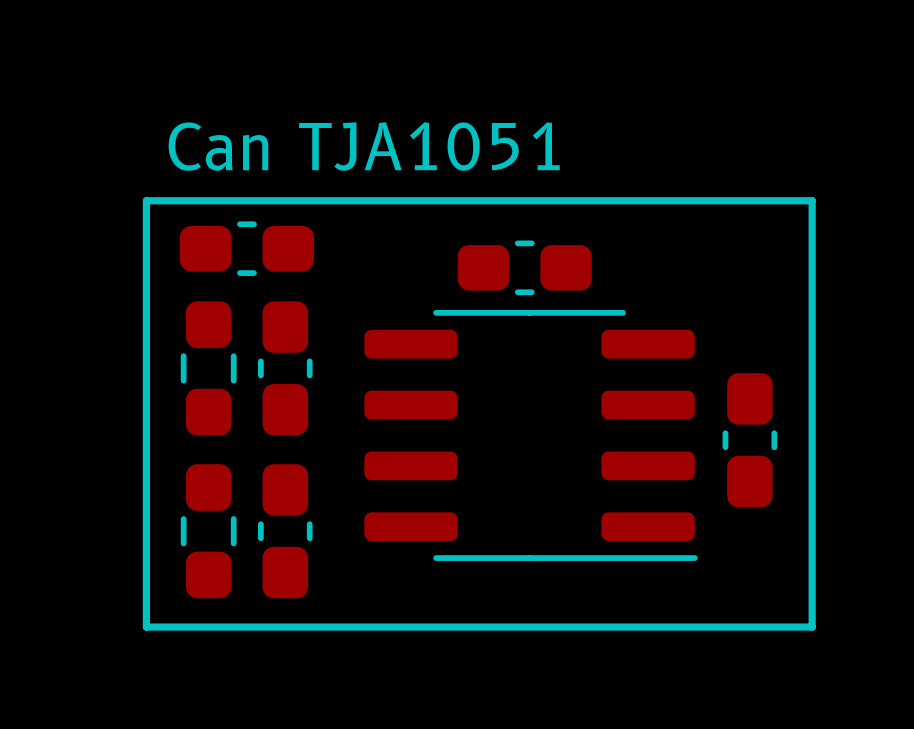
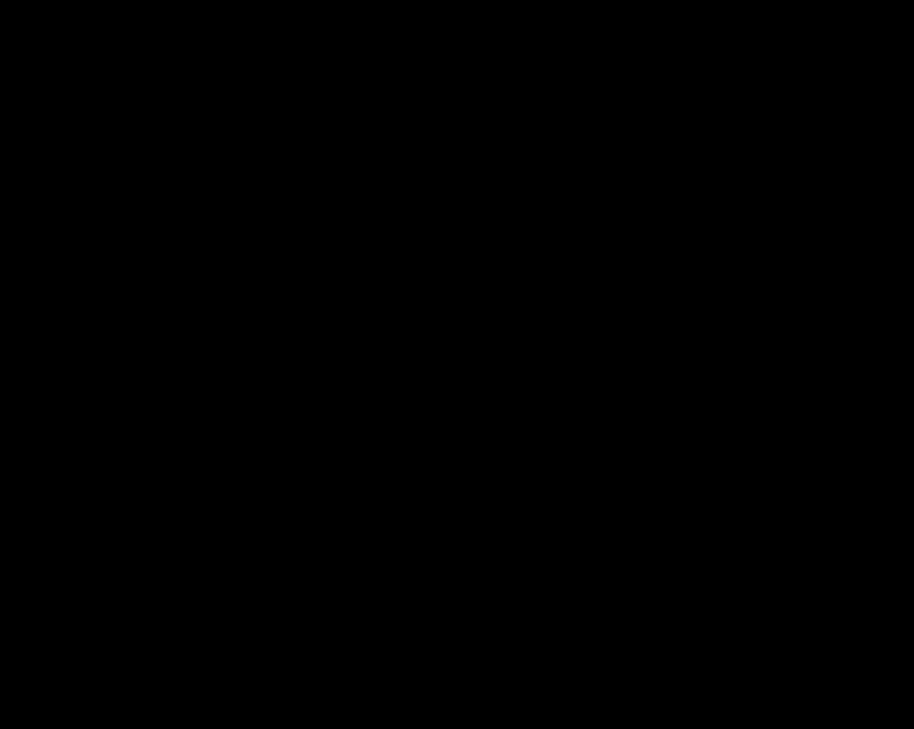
text: Can TJA1051 (364, 146) -> none
line: (146, 200) (812, 200) (812, 627) (146, 627) (146, 200) -> none
part: (246, 248) -> none
part: (524, 267) -> none
part: (208, 368) -> none
part: (285, 368) -> none
part: (531, 435) -> none
part: (749, 440) -> none
part: (208, 531) -> none
part: (285, 531) -> none

